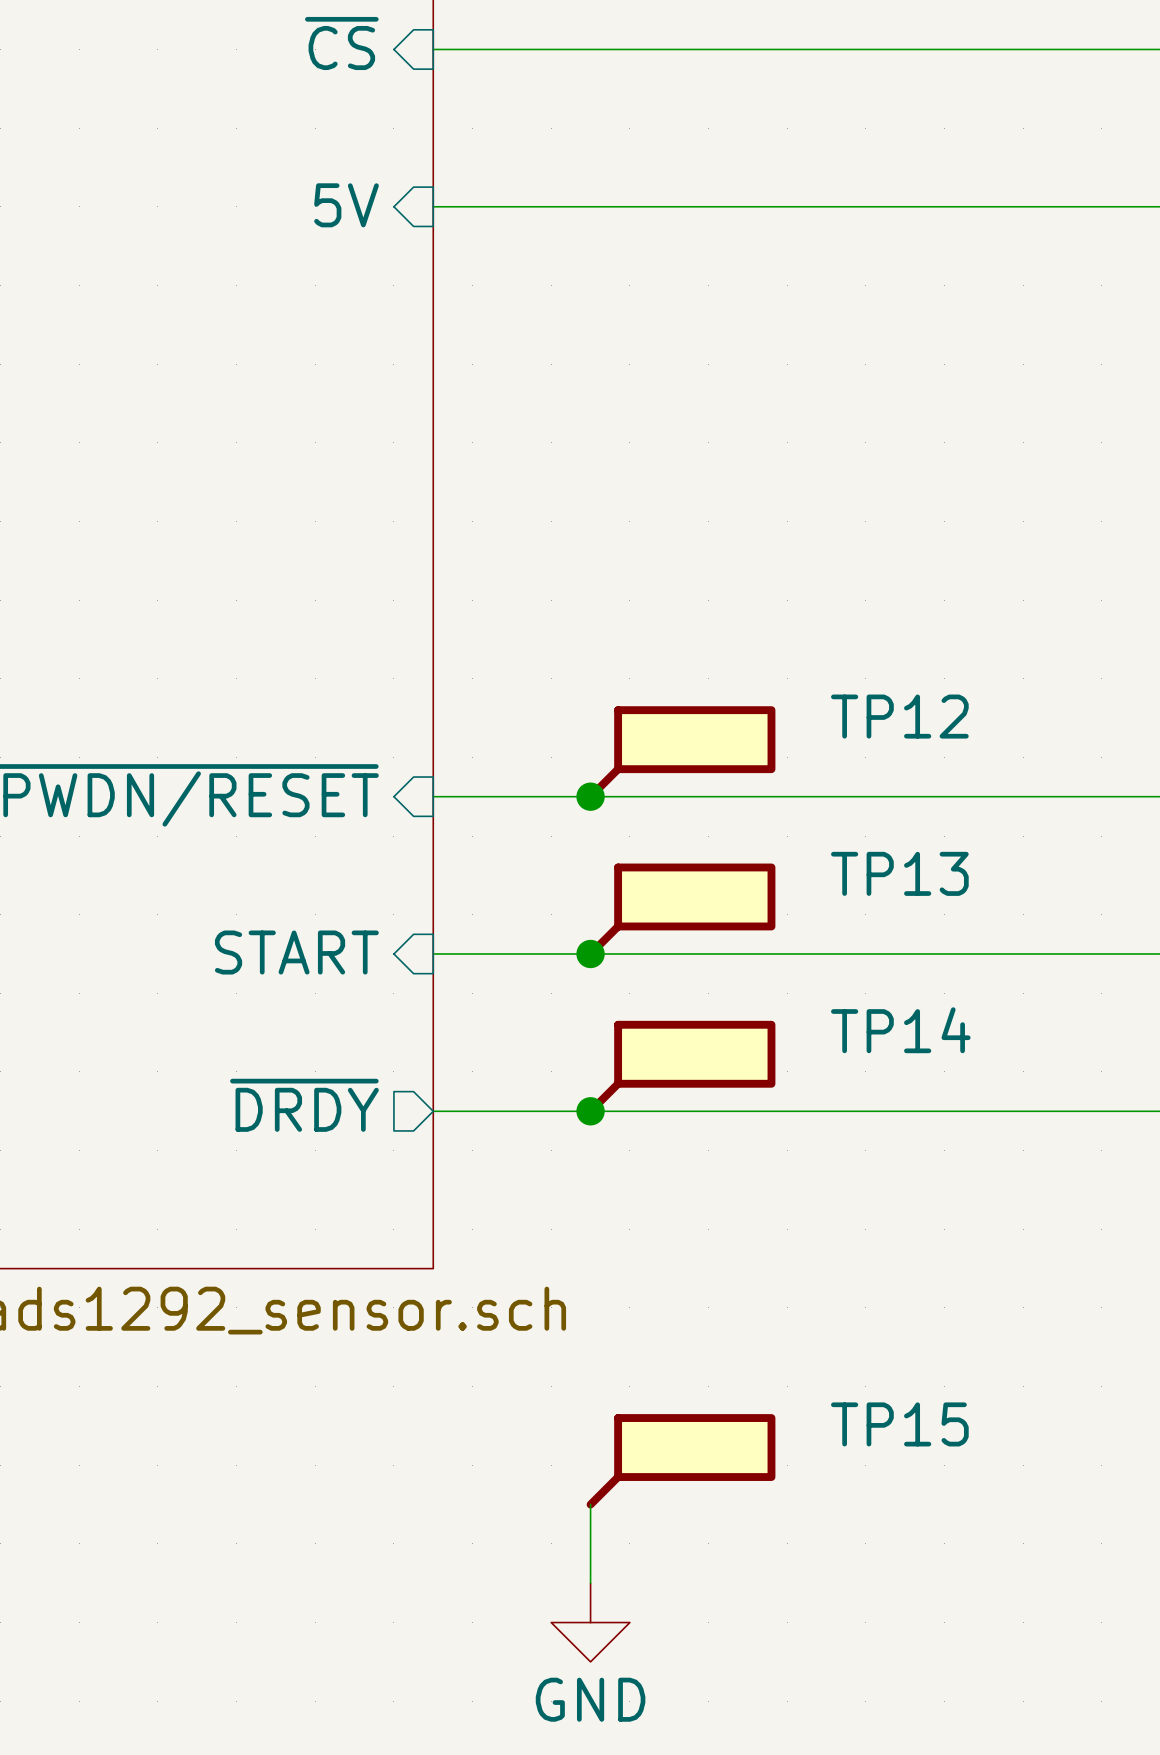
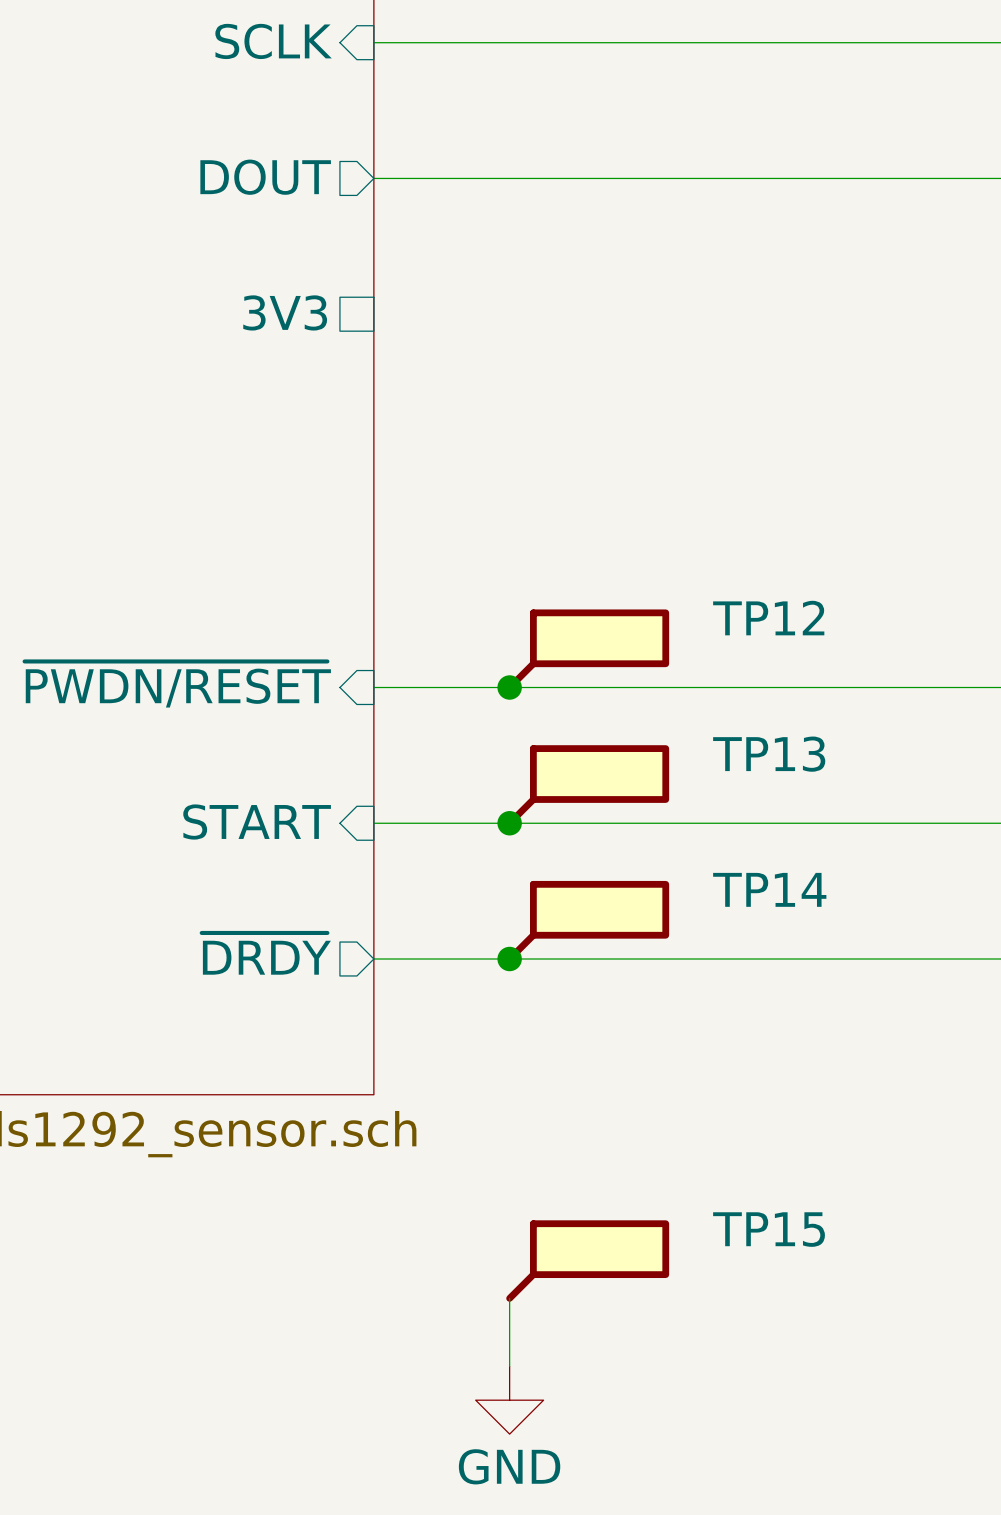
sheet pin: ~{CS} (341, 43) -> SCLK (273, 41)
sheet pin shape: input (346, 205) -> output (265, 177)
sheet pin: 5V (346, 205) -> DOUT (265, 177)
sheet pin: none -> 3V3 (285, 312)

